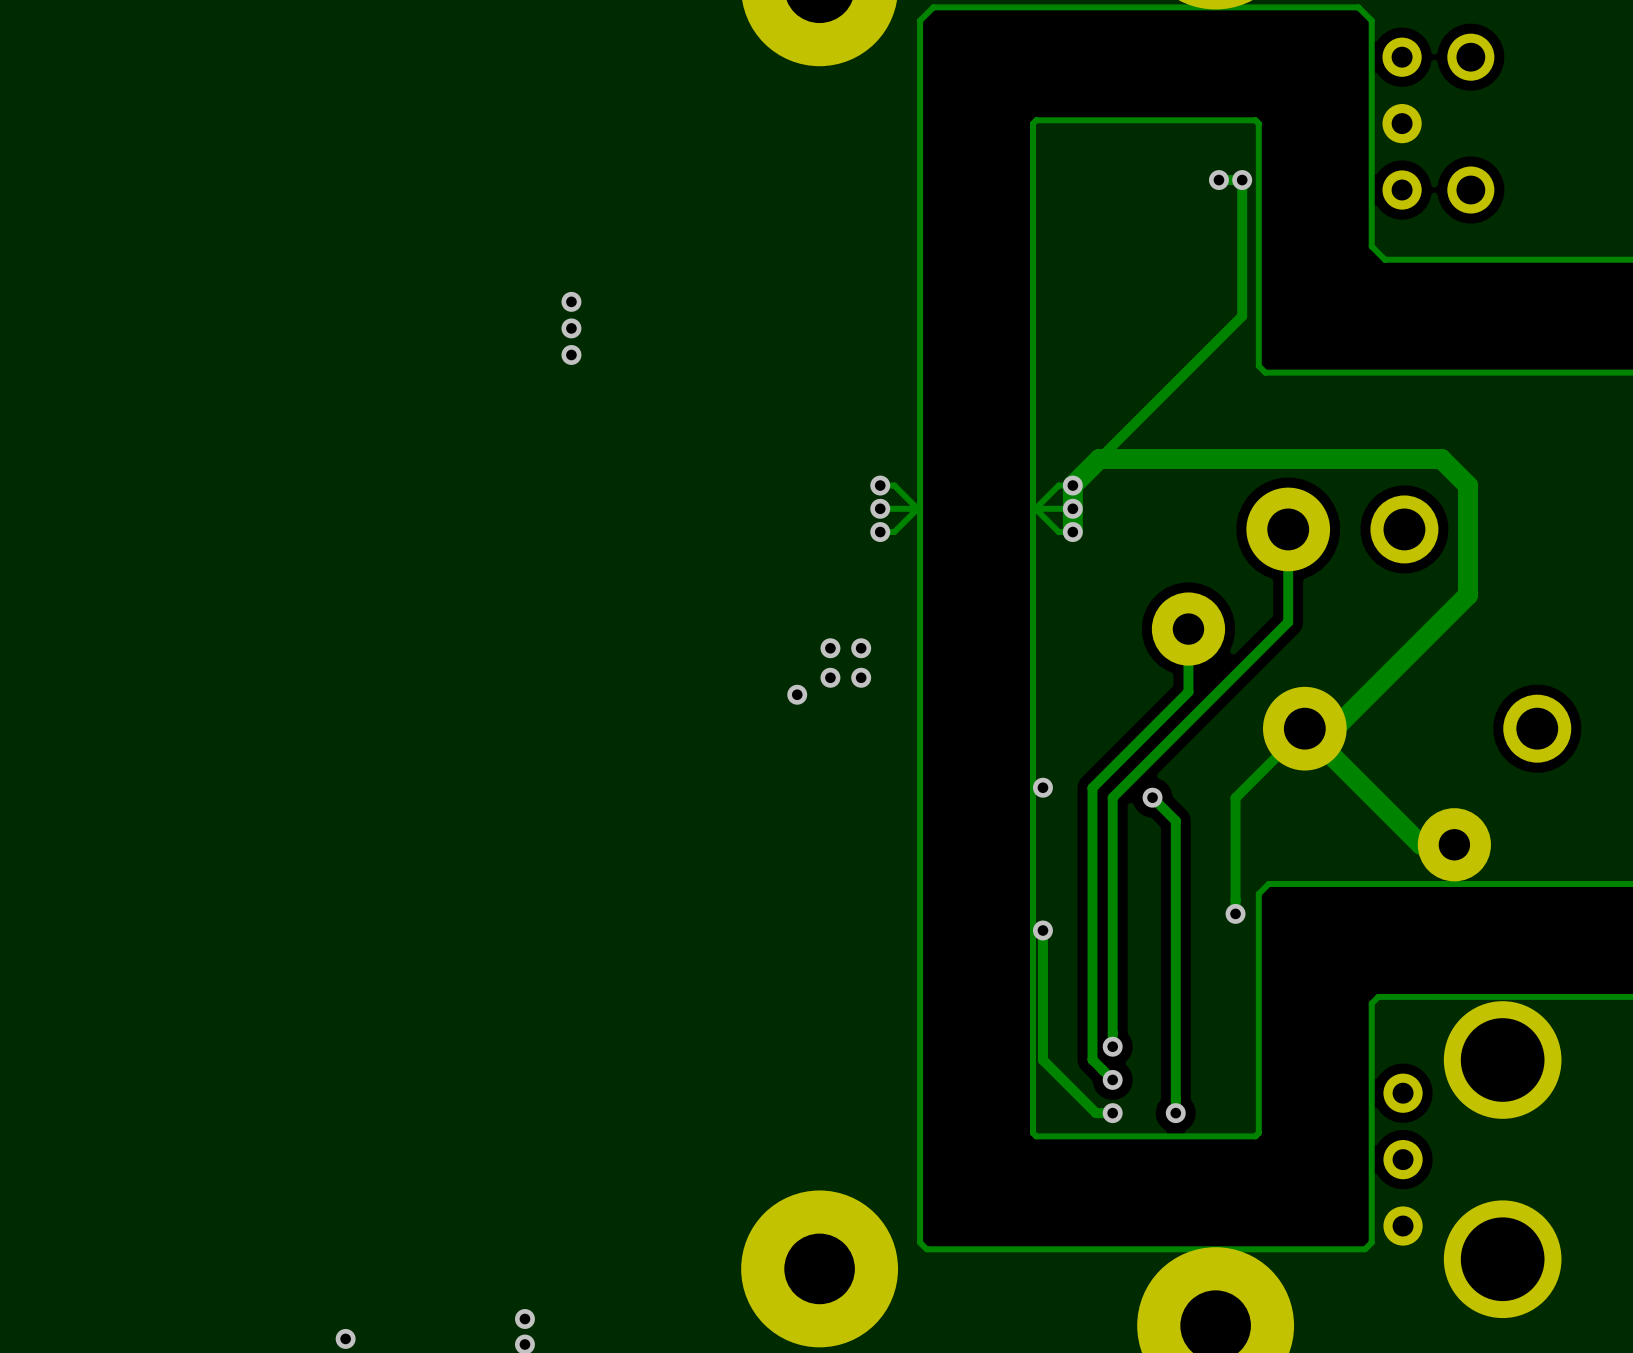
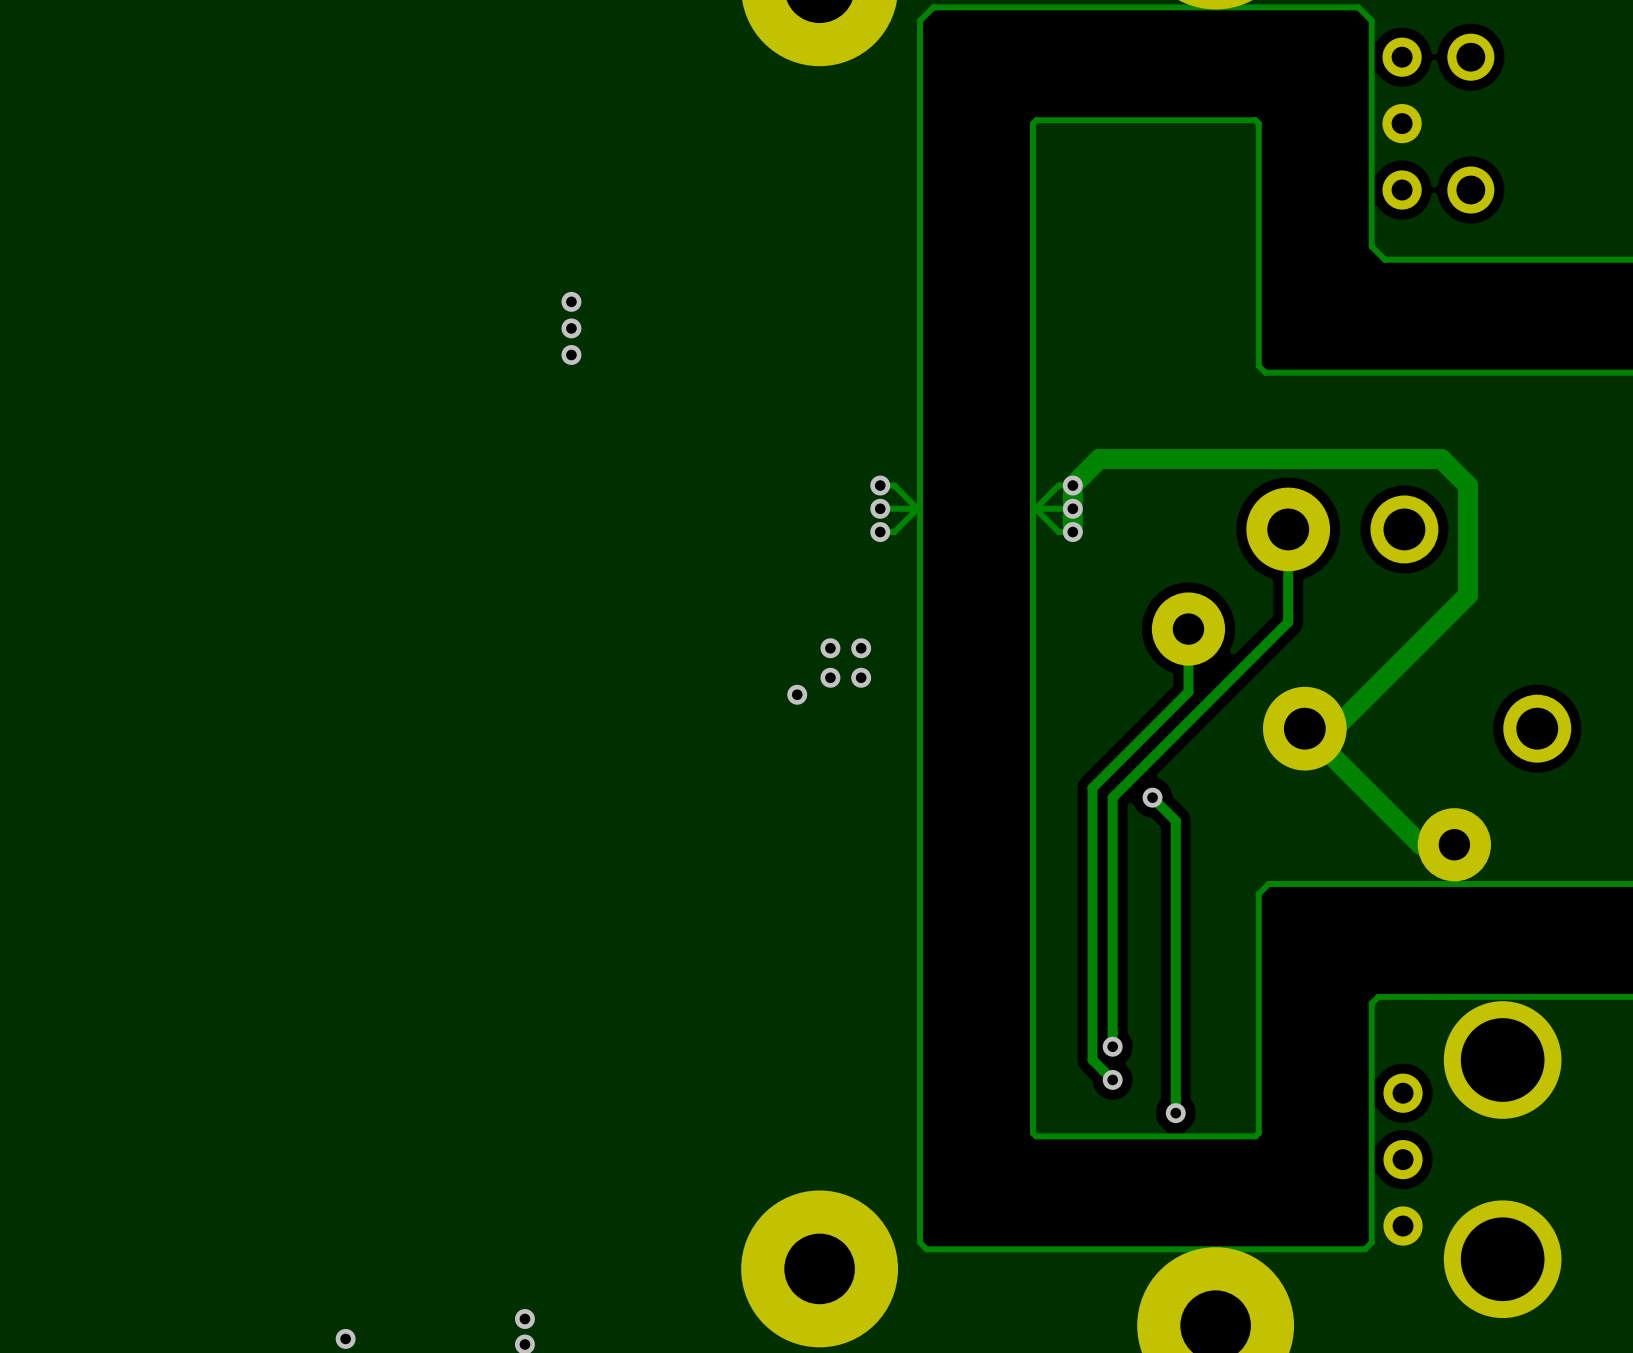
track: (1218, 180) (1242, 180) (1242, 316) (1072, 485) -> none
via: (1218, 180) -> none
via: (1242, 180) -> none
track: (1304, 728) (1235, 797) (1235, 913) -> none
via: (1042, 787) -> none
via: (1235, 913) -> none
track: (1042, 930) (1042, 1060) (1096, 1113) (1112, 1113) -> none
via: (1042, 930) -> none
via: (1112, 1113) -> none

